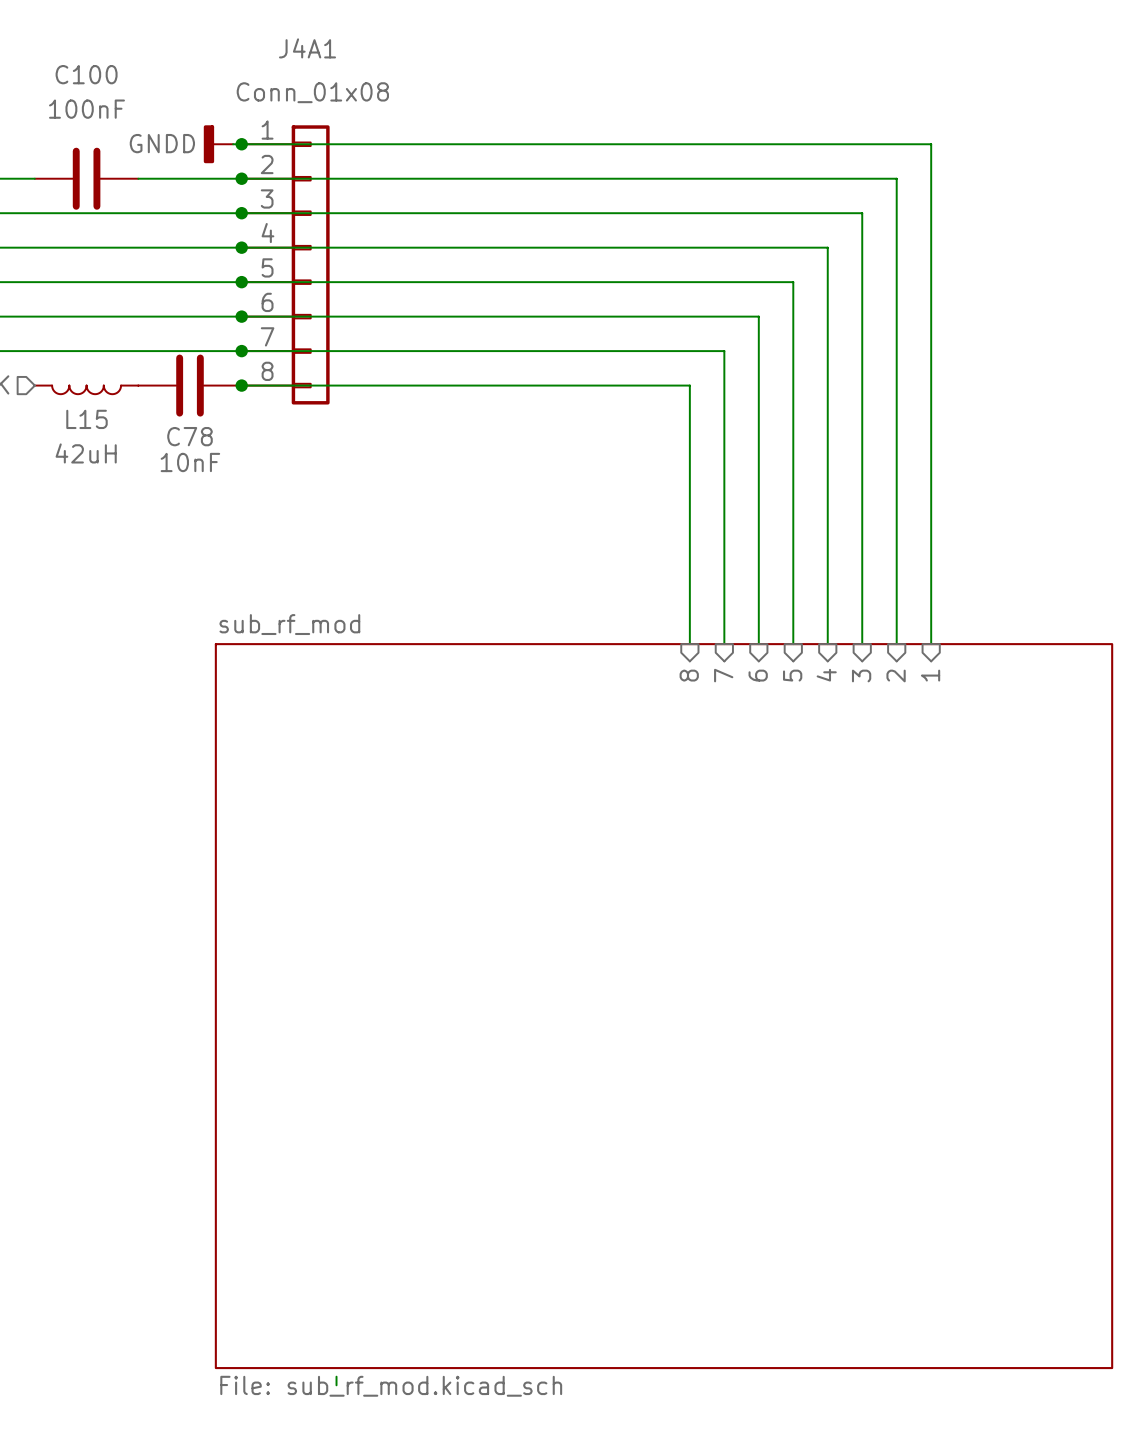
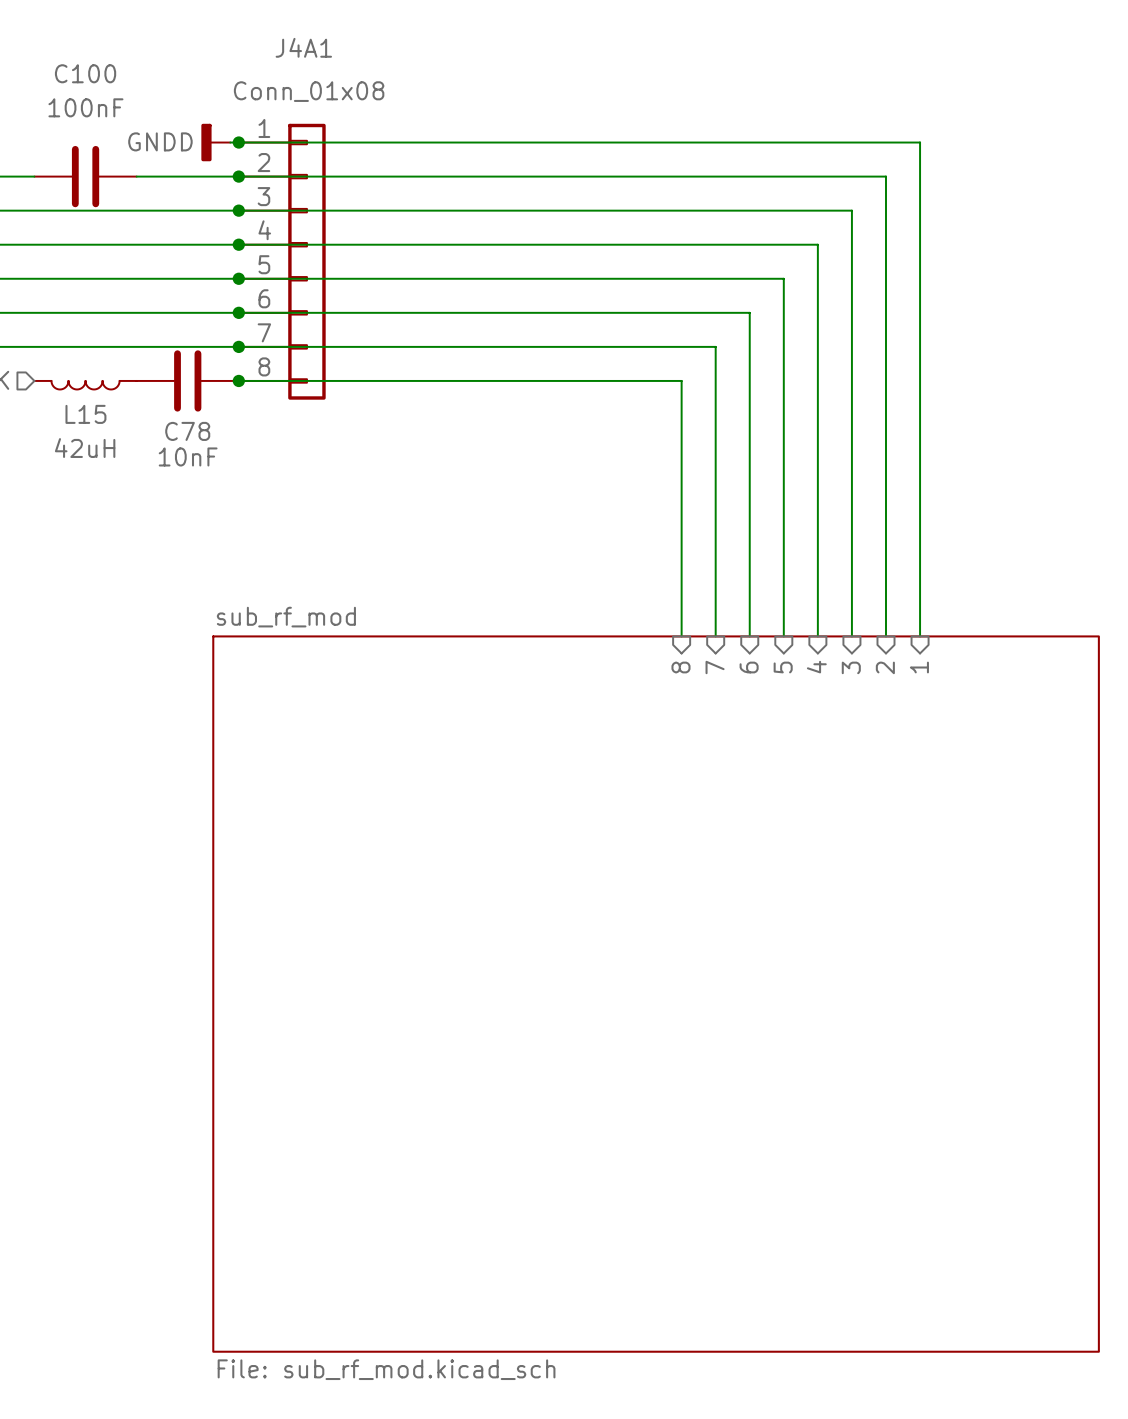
wire: (336, 1376) (336, 1385) -> none

